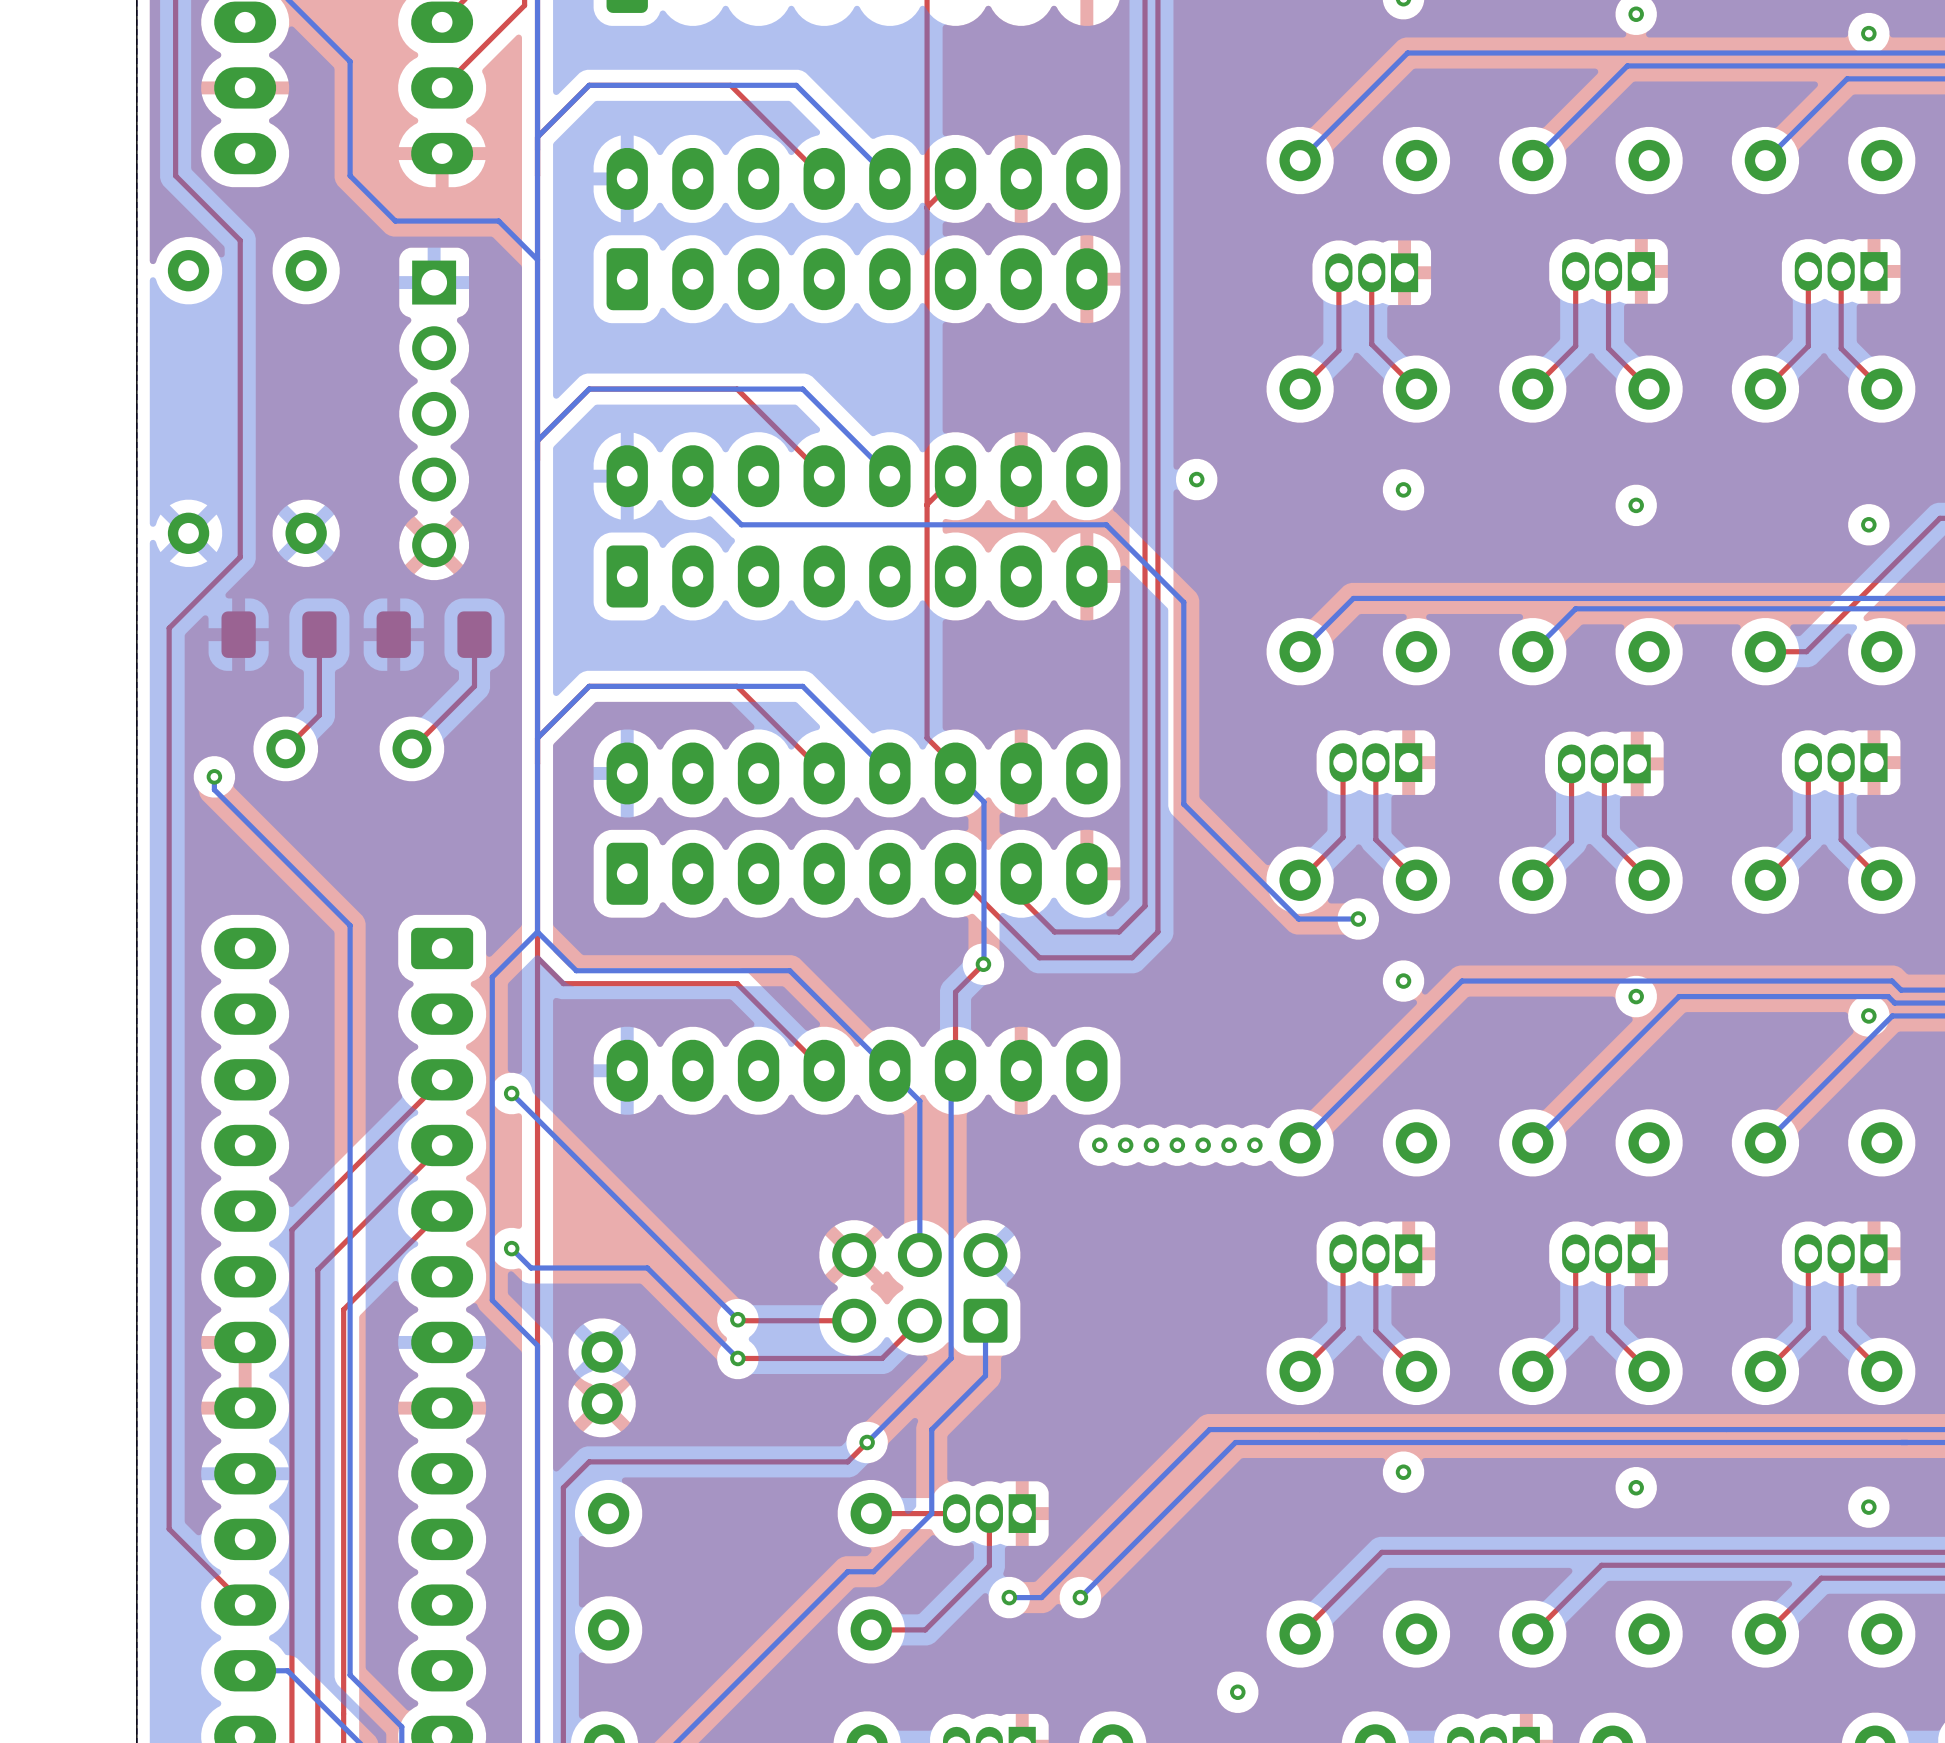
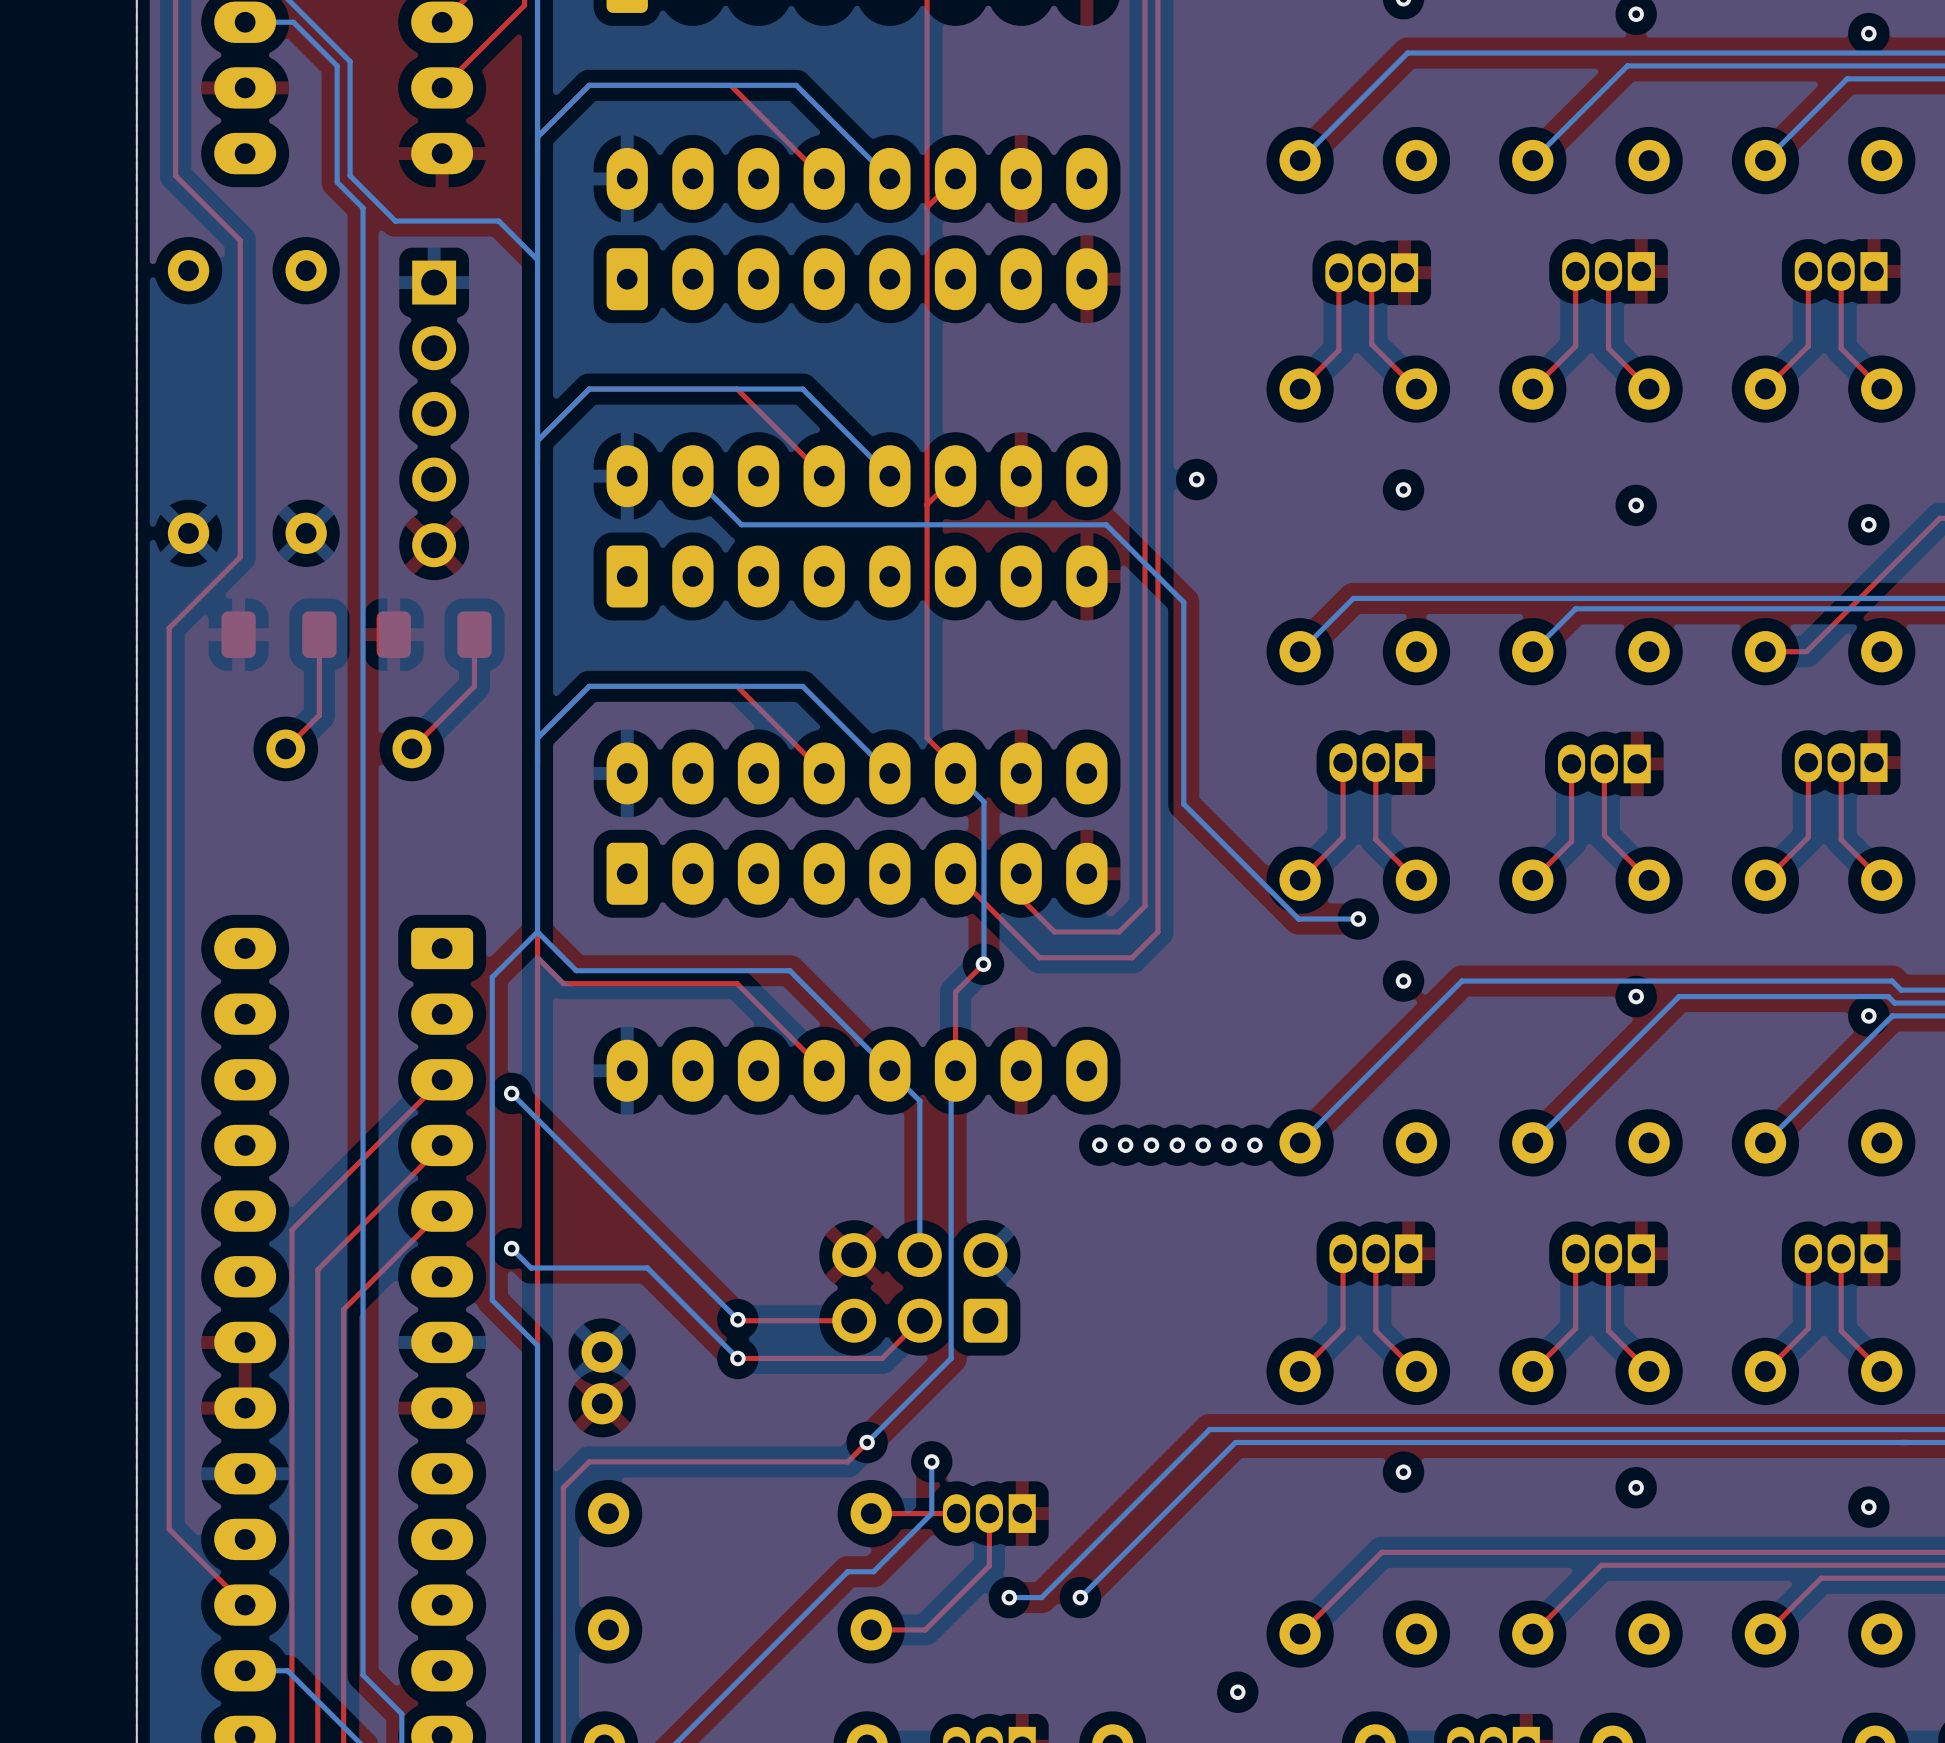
bottom track: (214, 776) (214, 789) (350, 925) (350, 1675) (401, 1726) -> (245, 22) (293, 22) (337, 65) (337, 182) (363, 208) (363, 1675) (401, 1713) (401, 1726)
via: (214, 776) -> none
bottom track: (985, 1320) (985, 1375) (931, 1429) (931, 1461) -> none
via: none -> (931, 1461)

